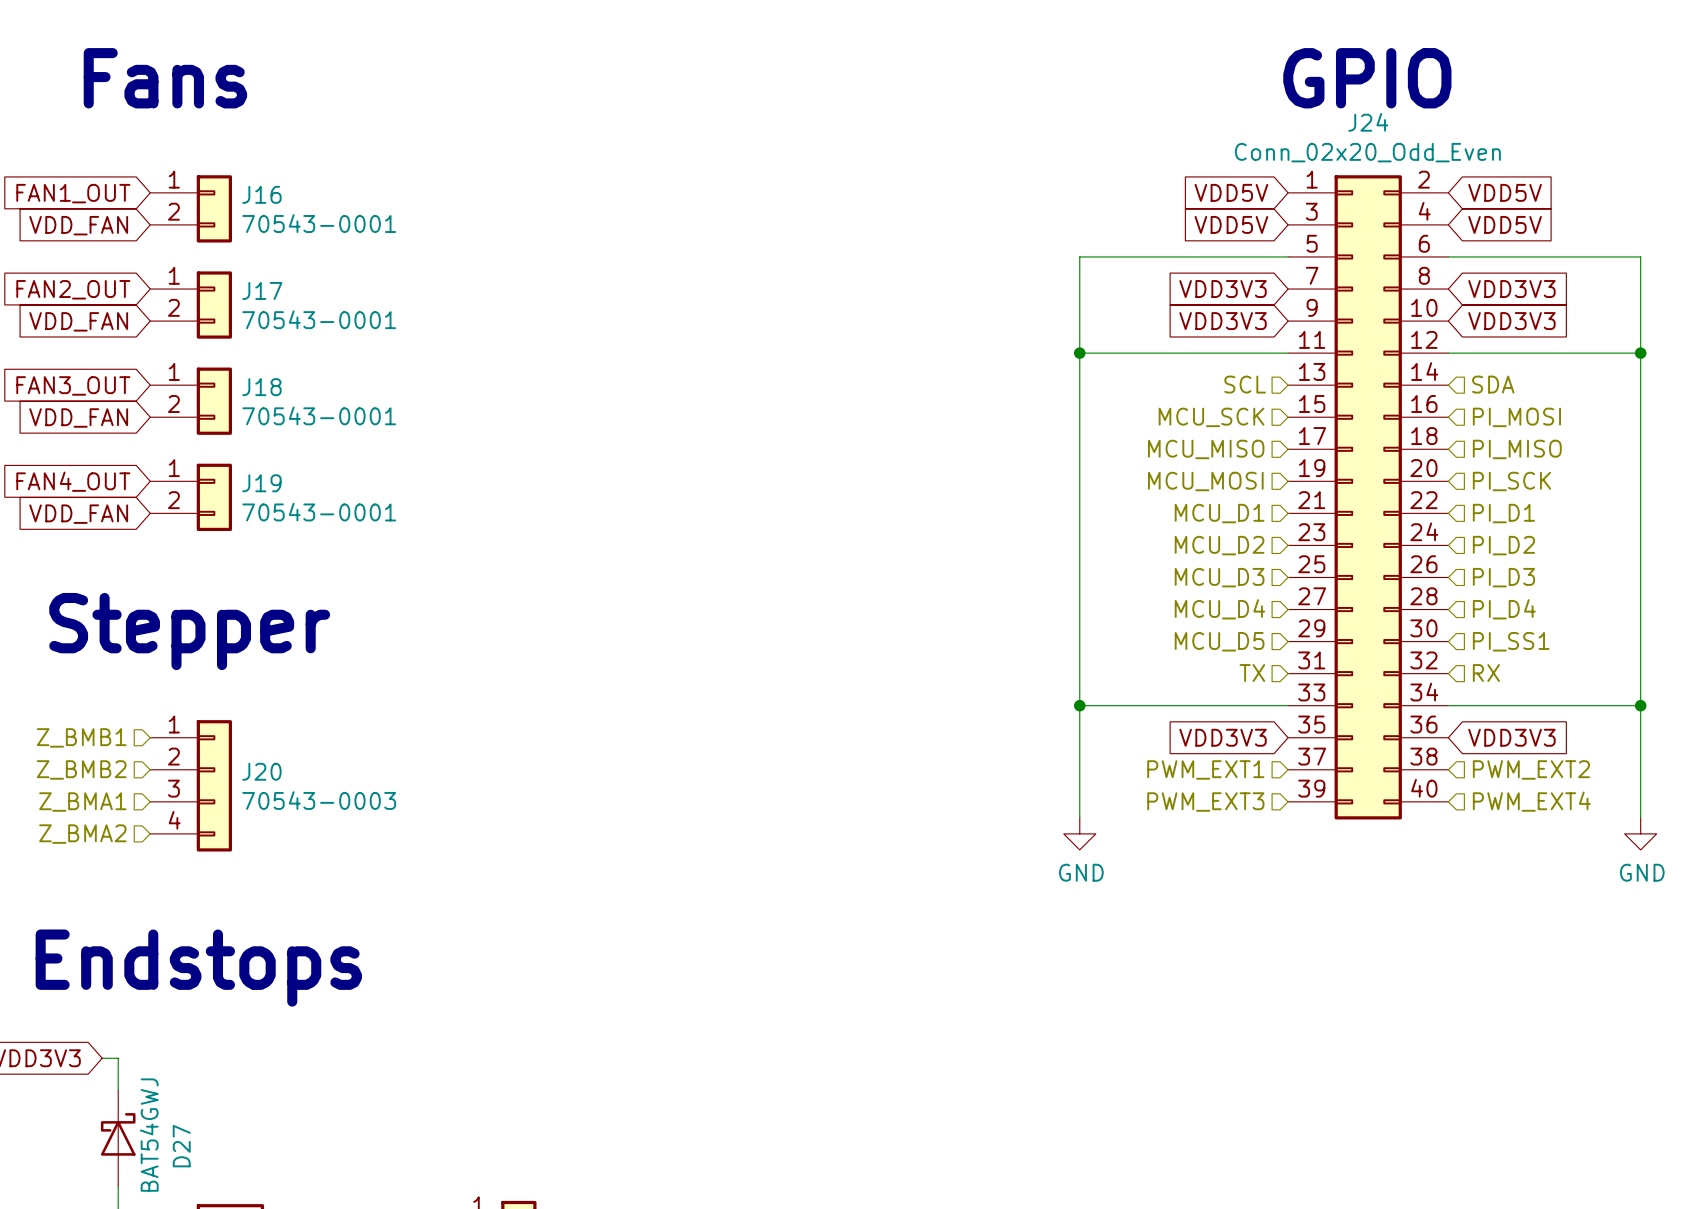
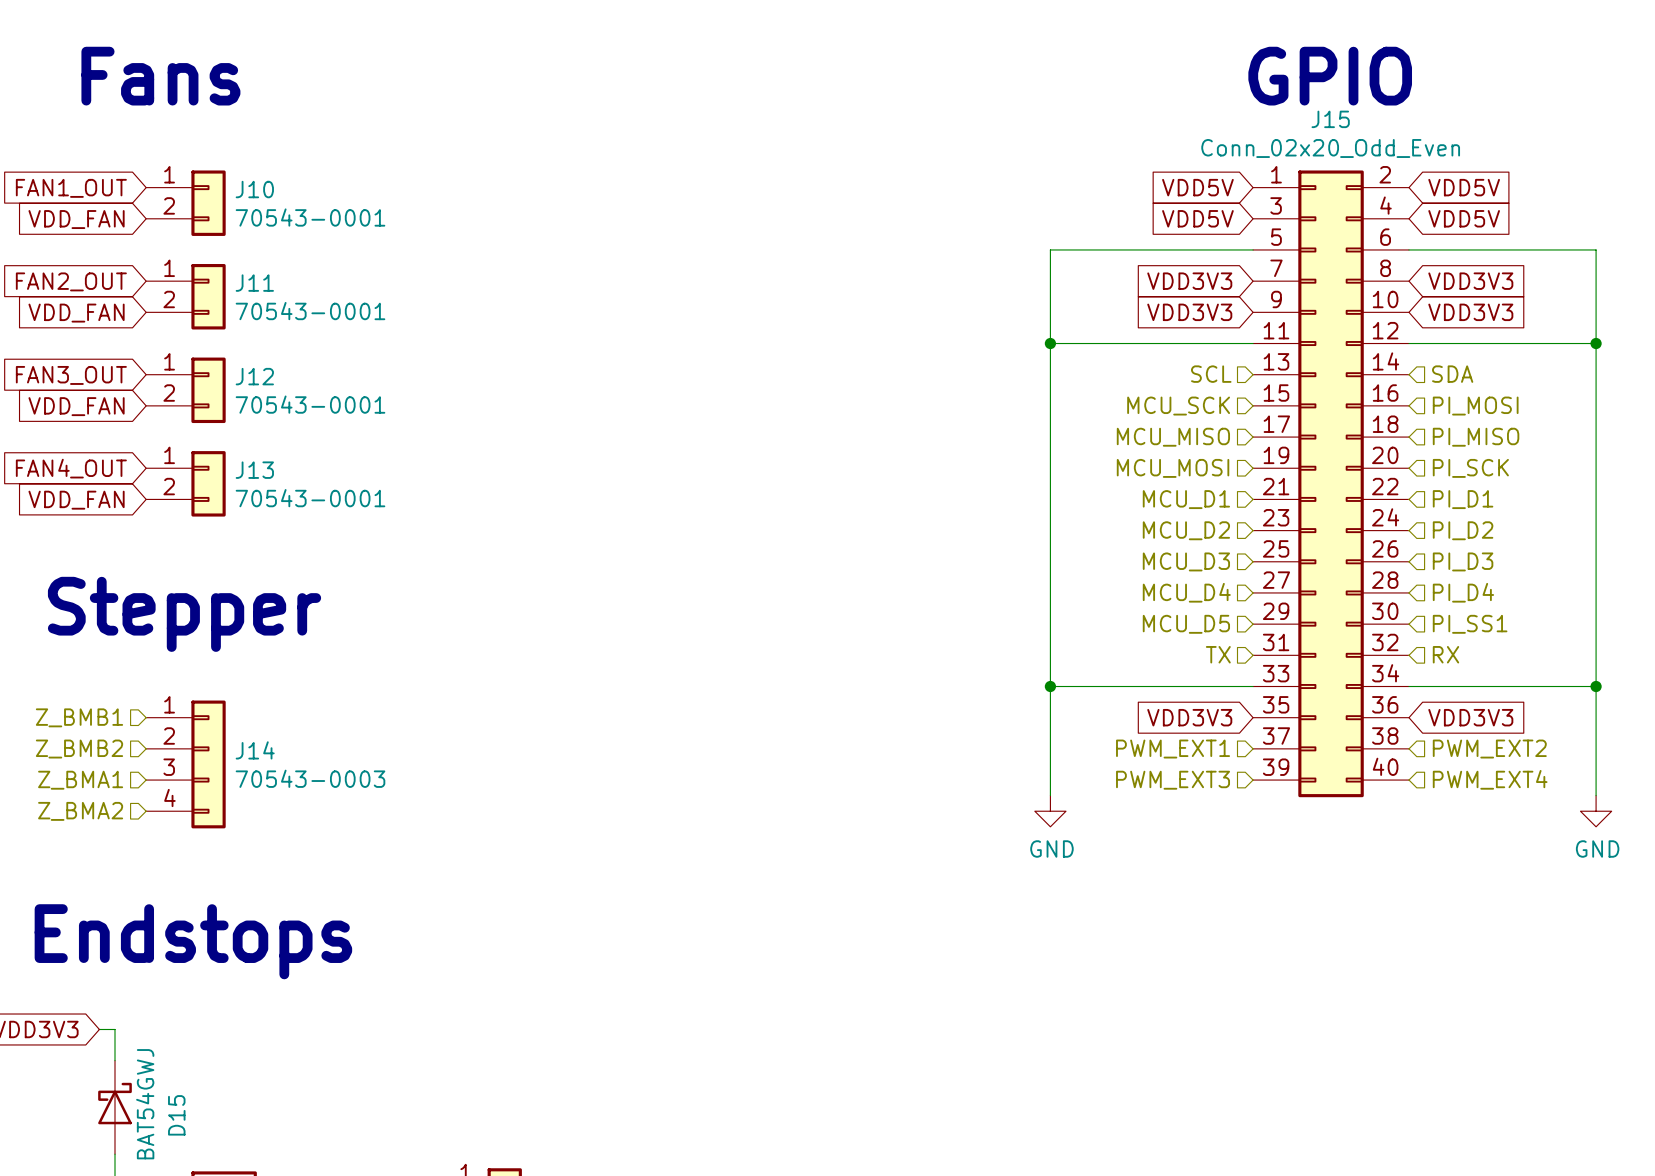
J24 name: J24 (1368, 122) -> J15 (1330, 119)
J16 name: J16 (261, 194) -> J10 (254, 189)
J17 name: J17 (262, 290) -> J11 (254, 283)
J18 name: J18 (261, 387) -> J12 (254, 376)
J19 name: J19 (261, 483) -> J13 (254, 470)
J20 name: J20 (261, 771) -> J14 (255, 750)
D27 name: D27 (181, 1146) -> D15 (176, 1115)

